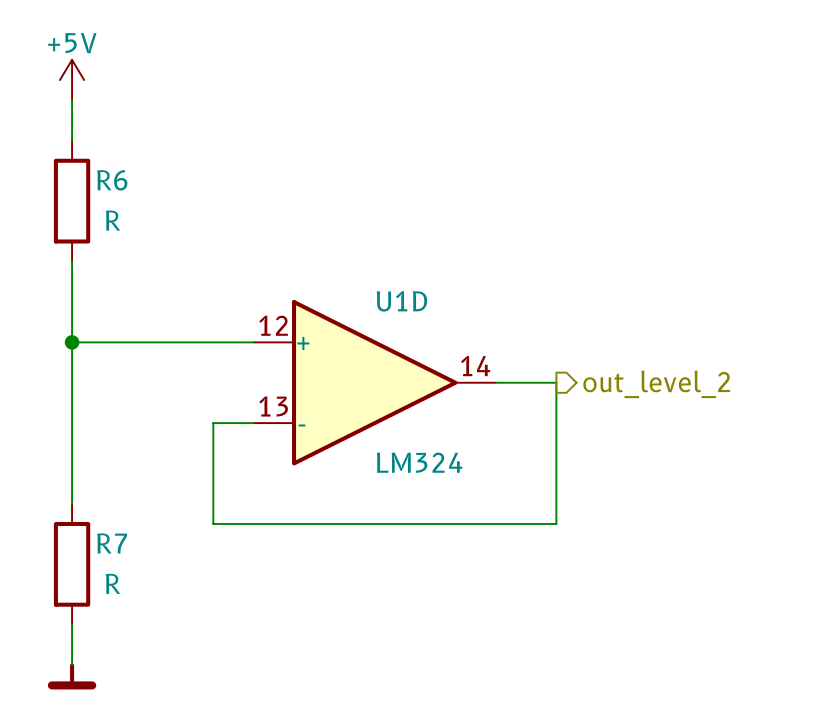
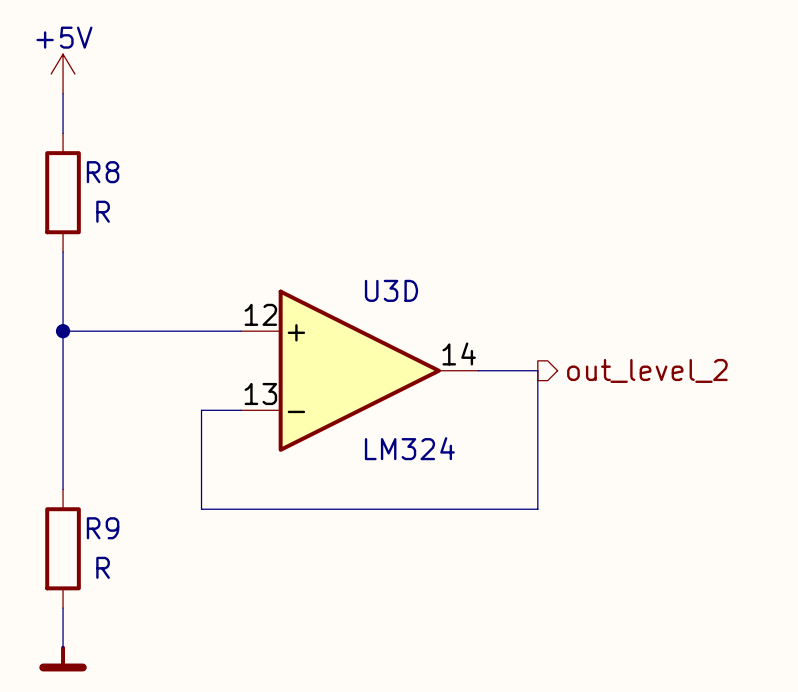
R6 name: R6 (112, 180) -> R8 (103, 172)
U1D name: U1D (401, 301) -> U3D (391, 290)
R7 name: R7 (112, 543) -> R9 (103, 528)

